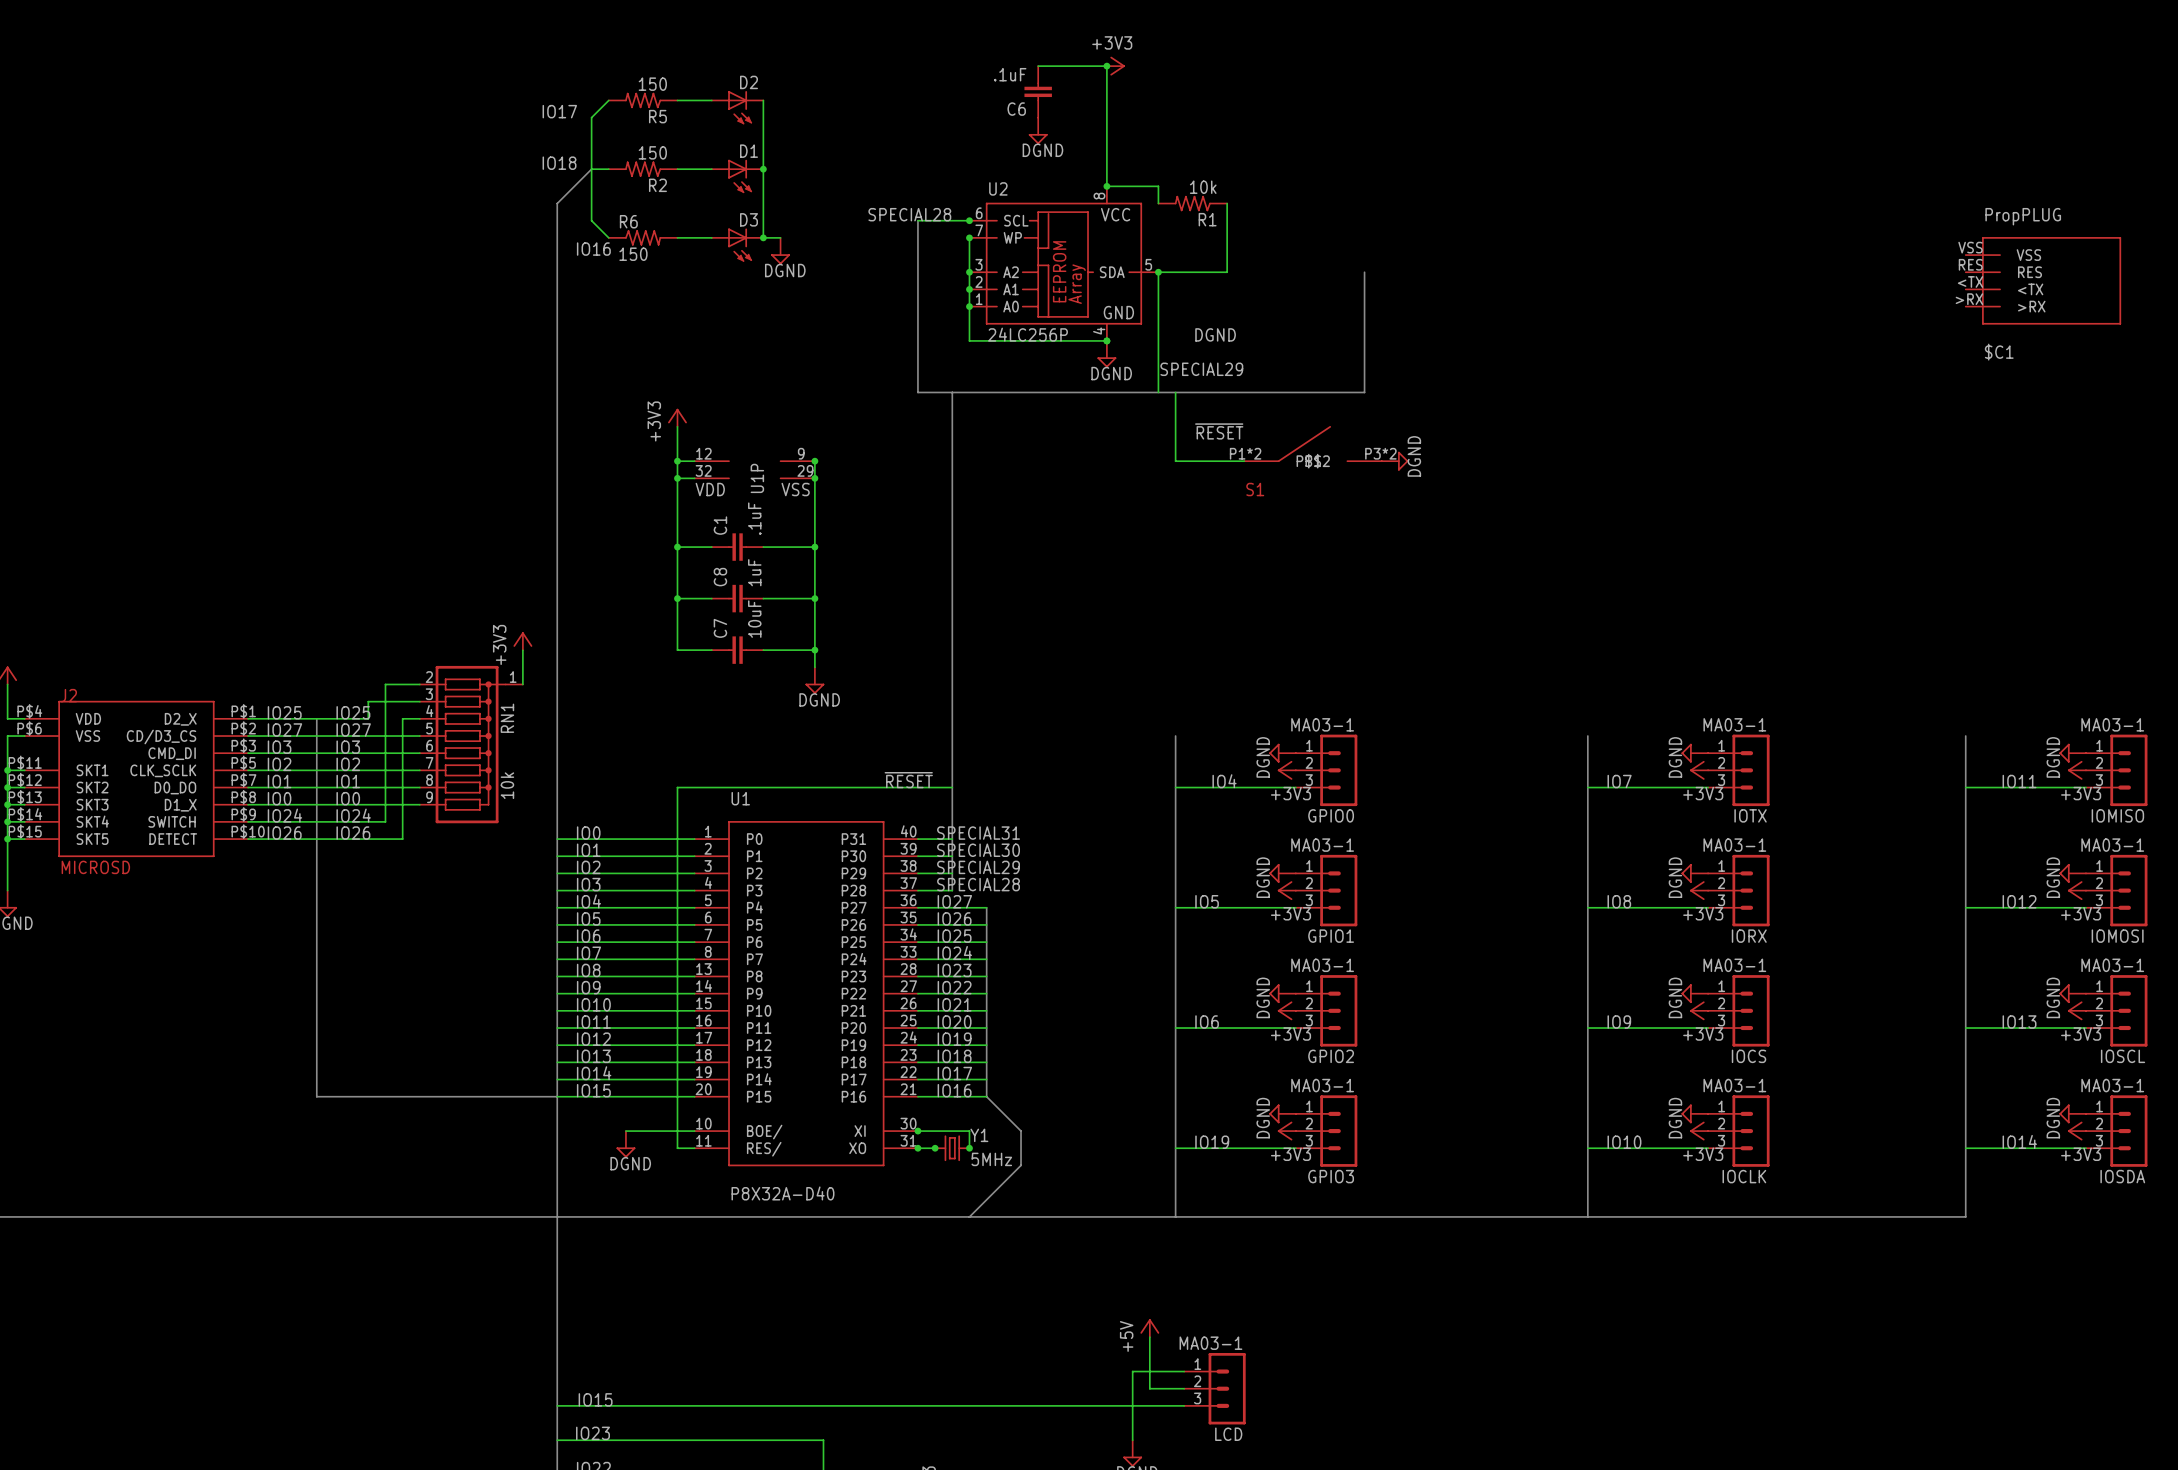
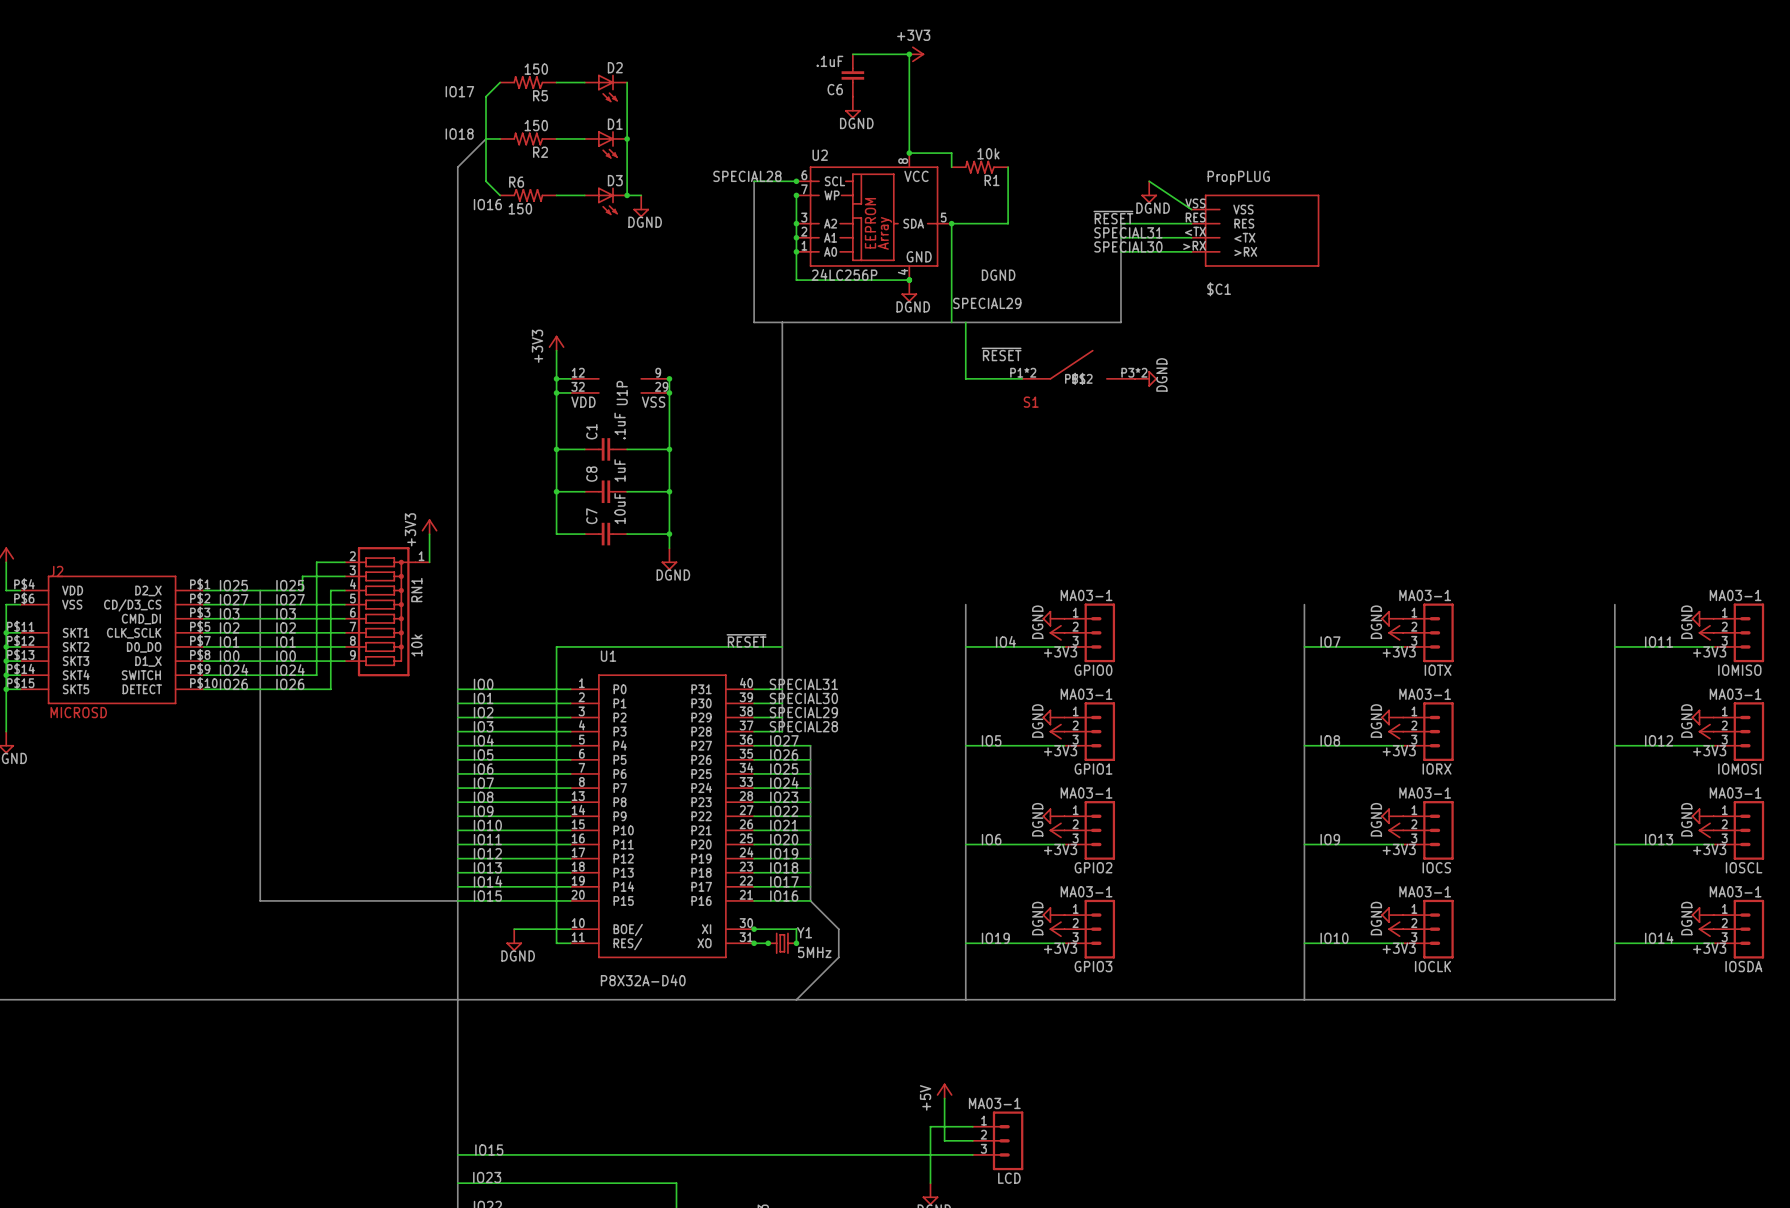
wire: none -> (1149, 181) (1191, 209)
power symbol: none -> DGND (1149, 192)
label: none -> ~{RESET} (1113, 217)
wire: none -> (1120, 223) (1191, 223)
part: none -> (1255, 230)
part: (2043, 280) -> none
label: none -> SPECIAL31 (1128, 232)
wire: none -> (1120, 237) (1191, 237)
label: none -> SPECIAL30 (1128, 246)
wire: none -> (1120, 251) (1191, 251)

